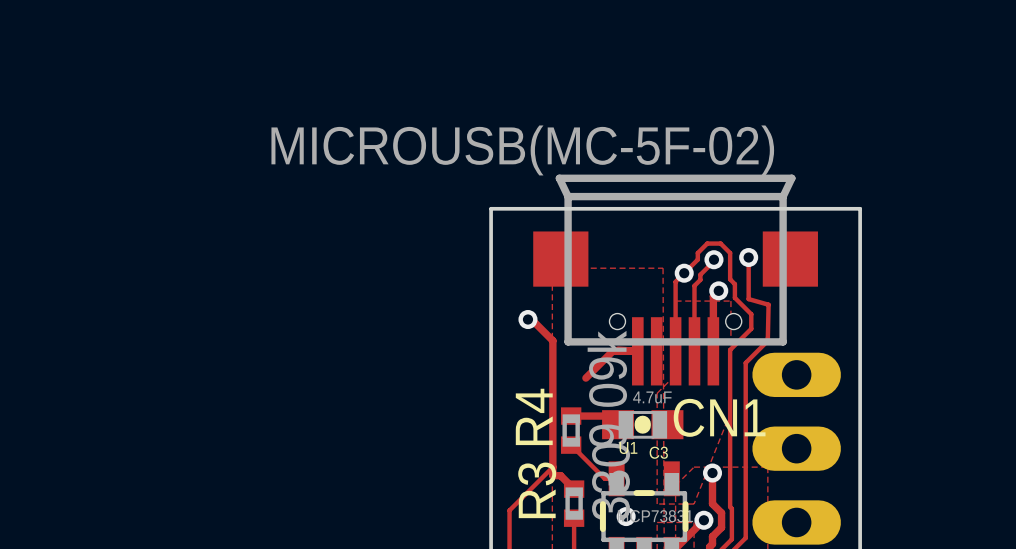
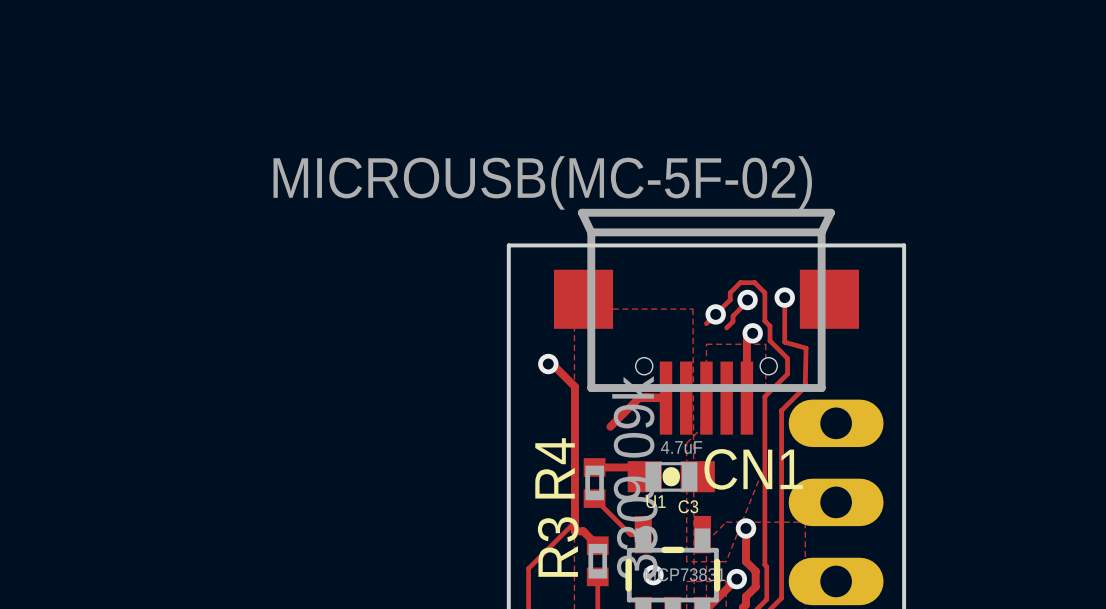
track: (675, 281) (675, 351) -> none
track: (694, 285) (694, 351) -> none

